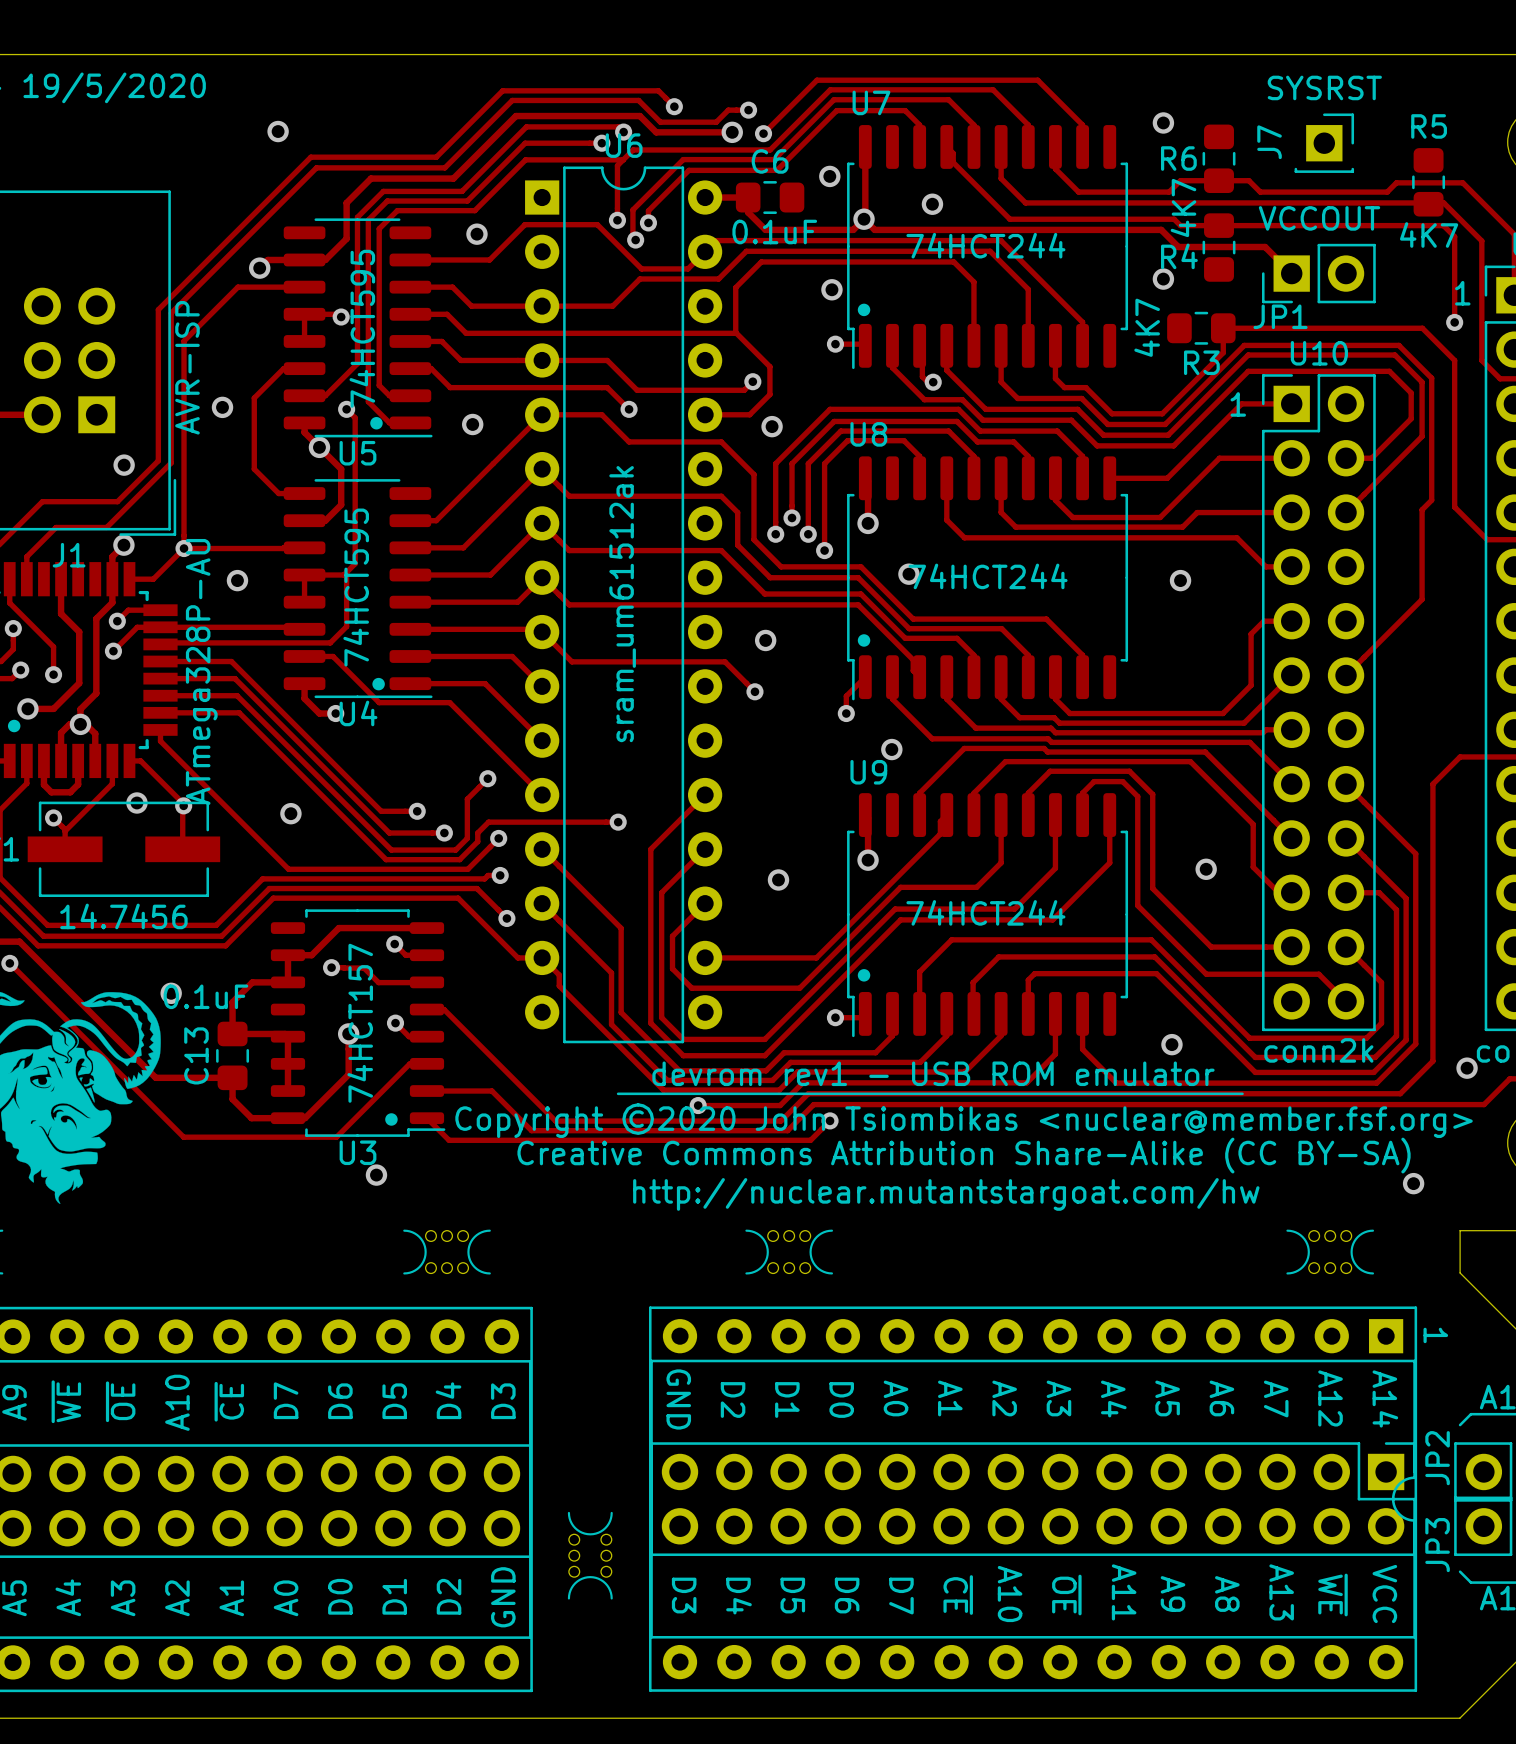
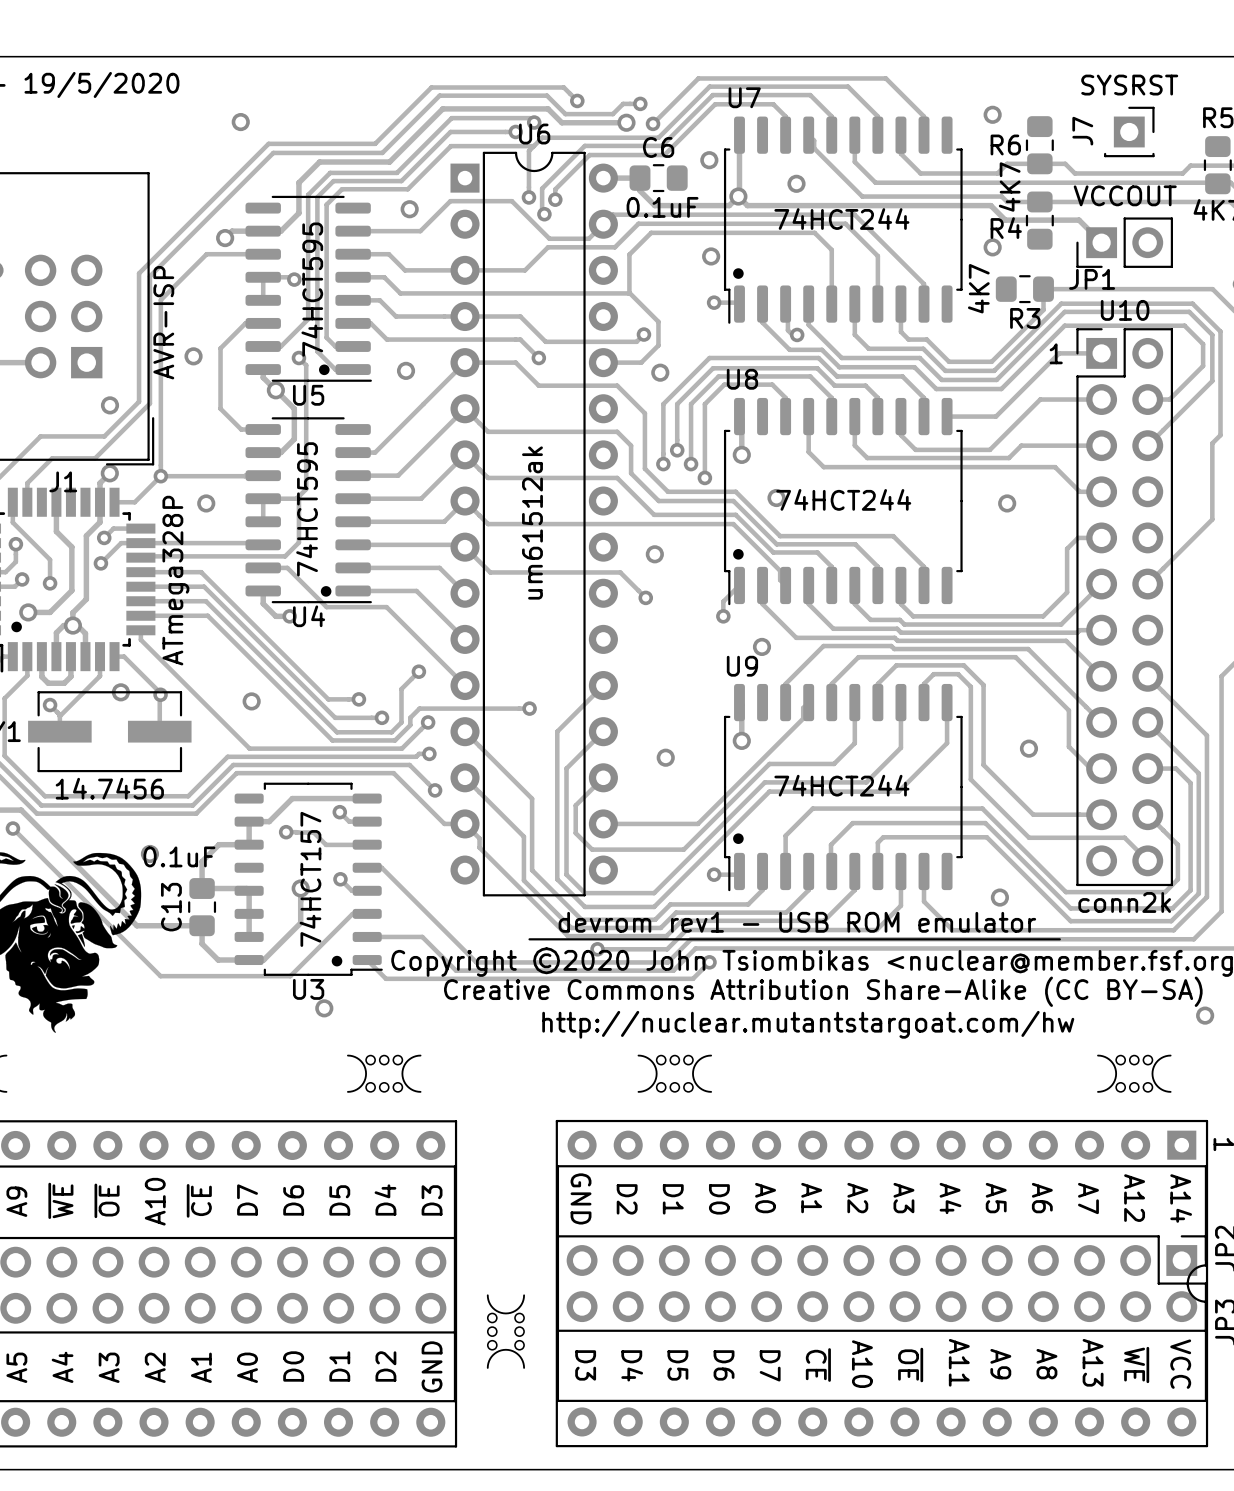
U6 value: sram_um61512ak (622, 604) -> um61512ak (532, 523)
part value: ATmega328P-AU (201, 671) -> ATmega328P (175, 580)

